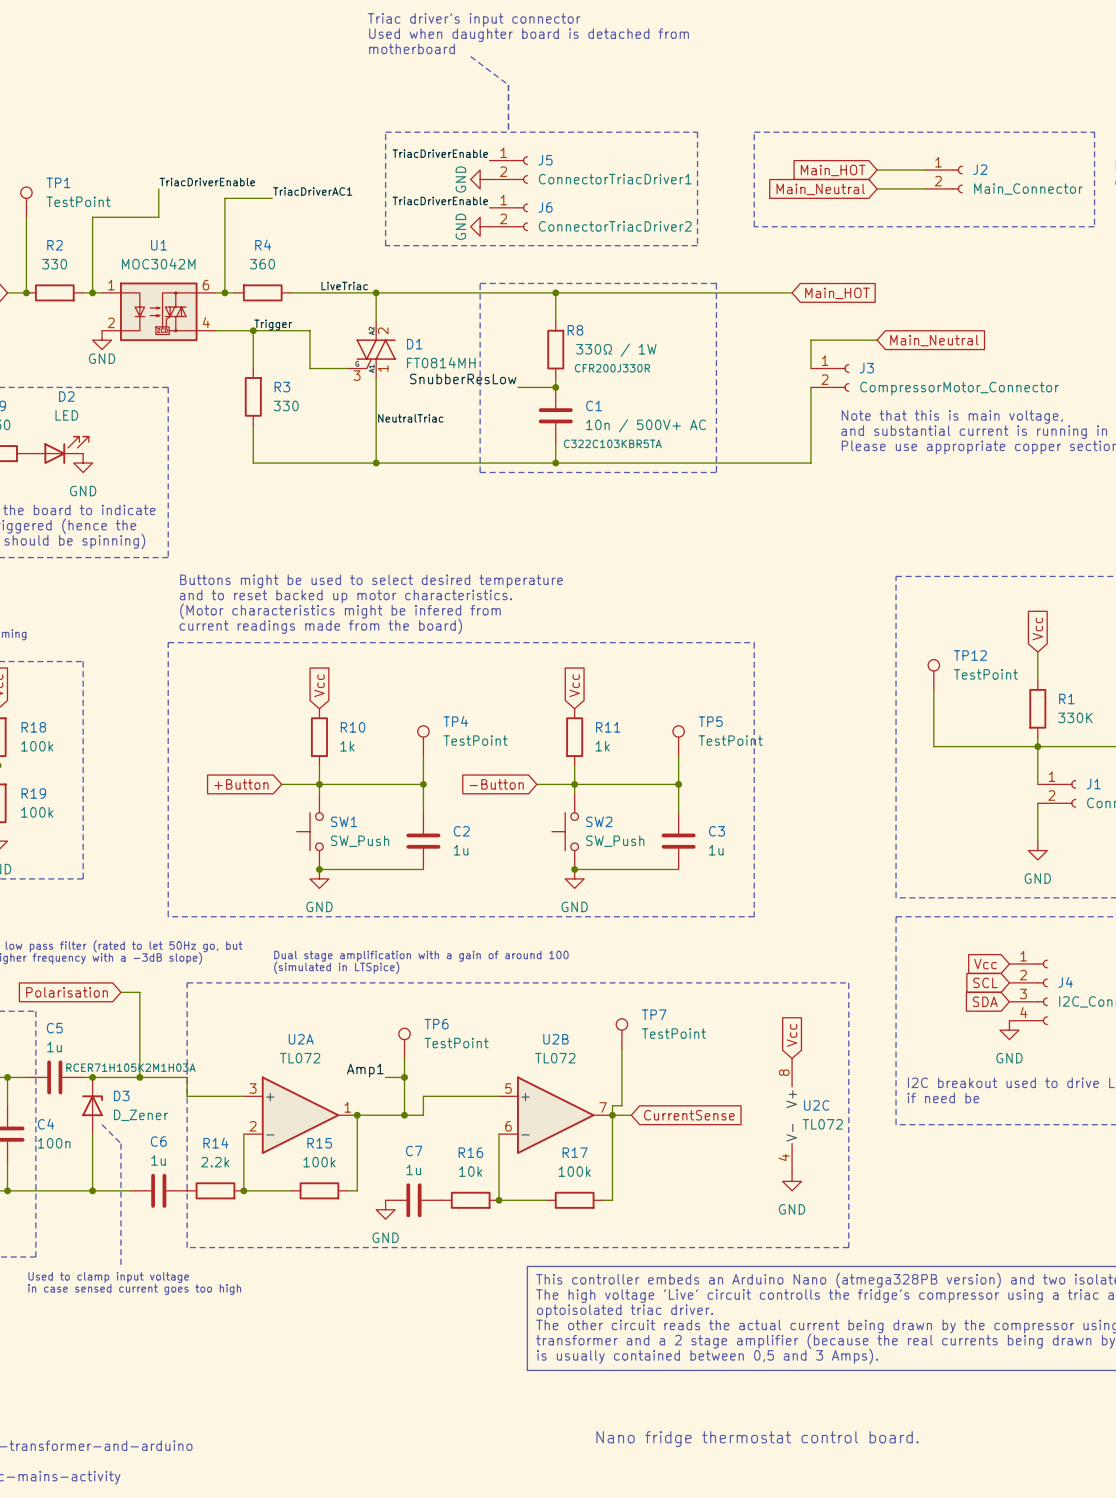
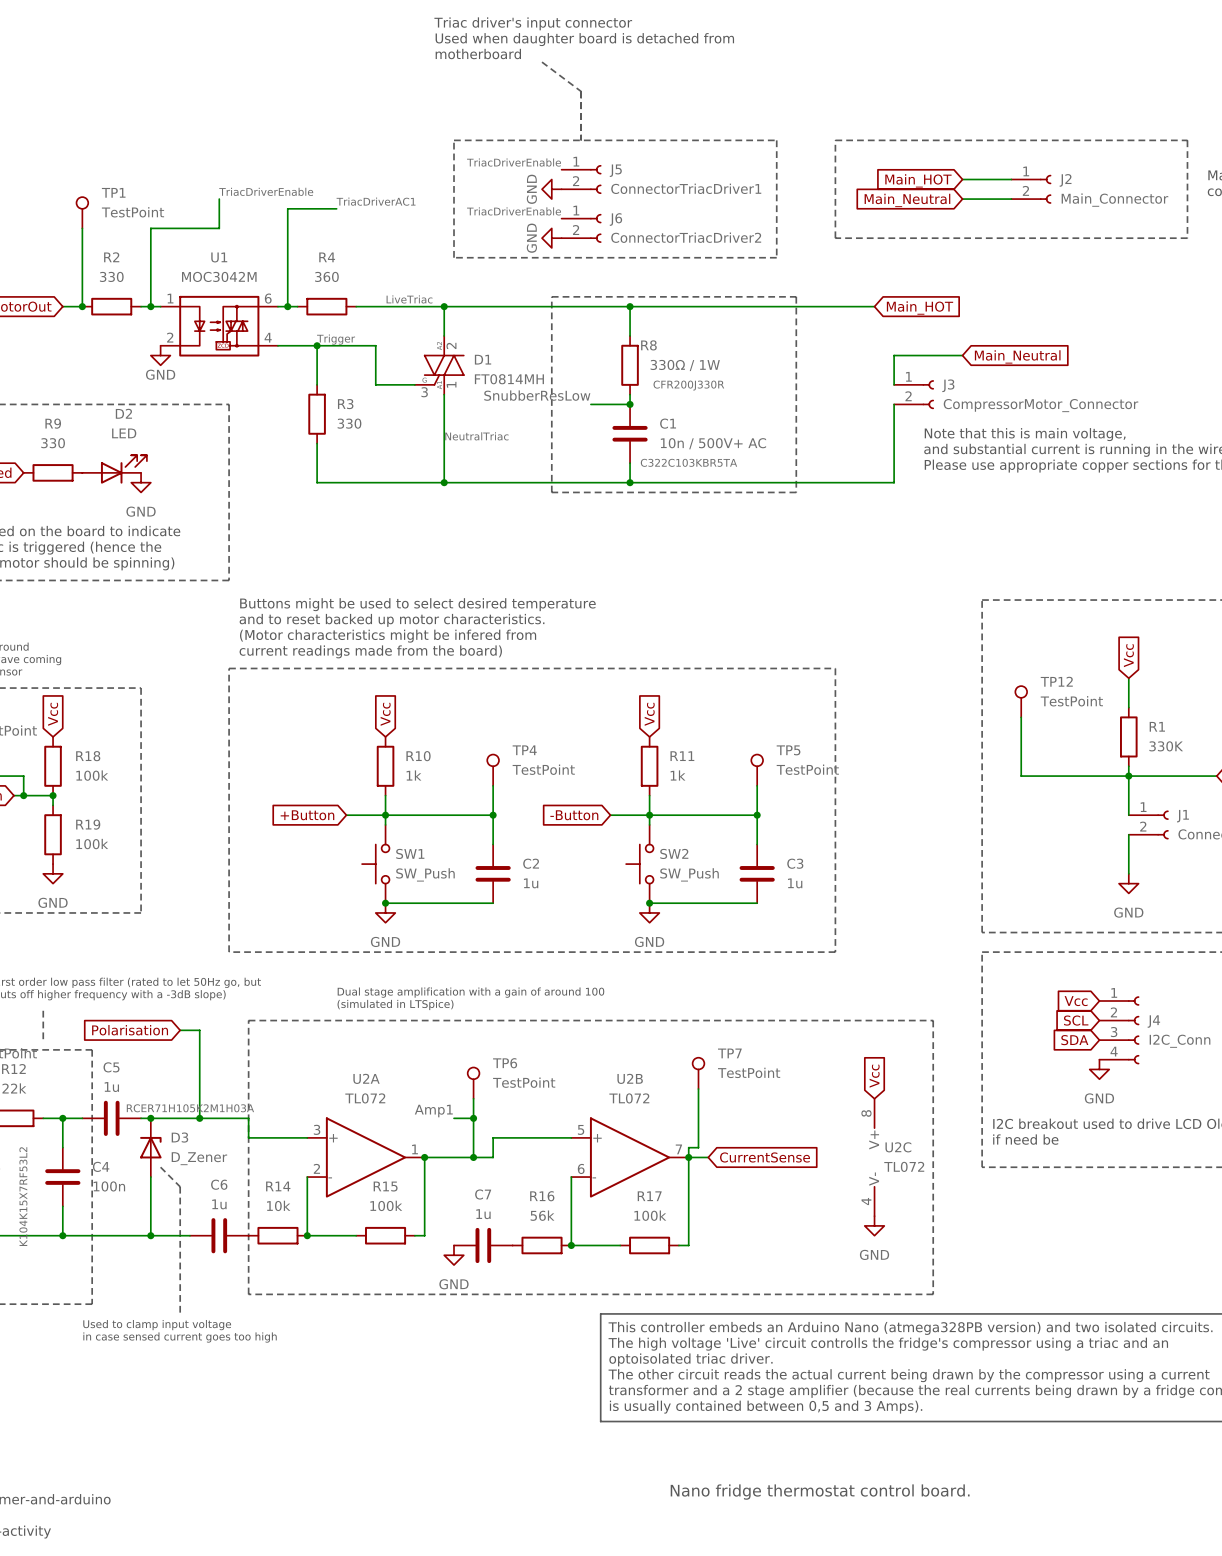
R14 value: 2.2k (215, 1162) -> 10k (278, 1205)
R16 value: 10k (470, 1171) -> 56k (542, 1215)

